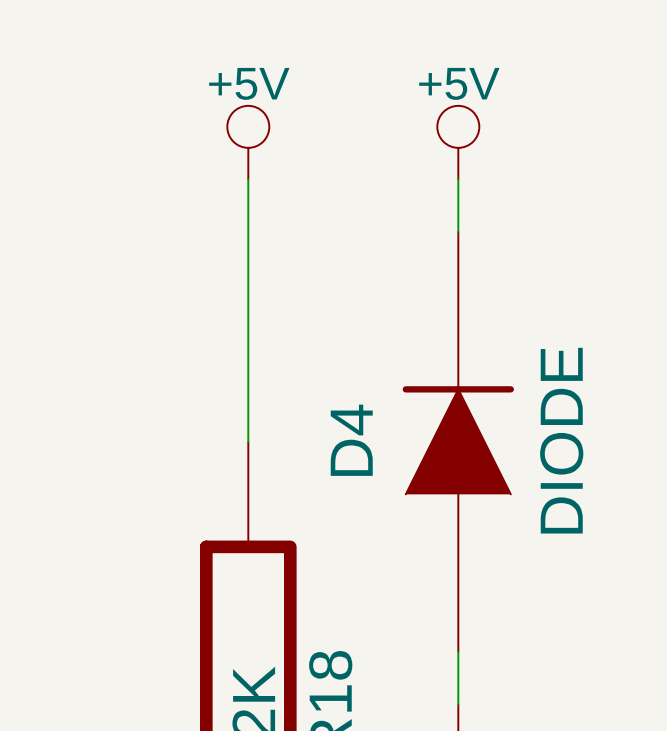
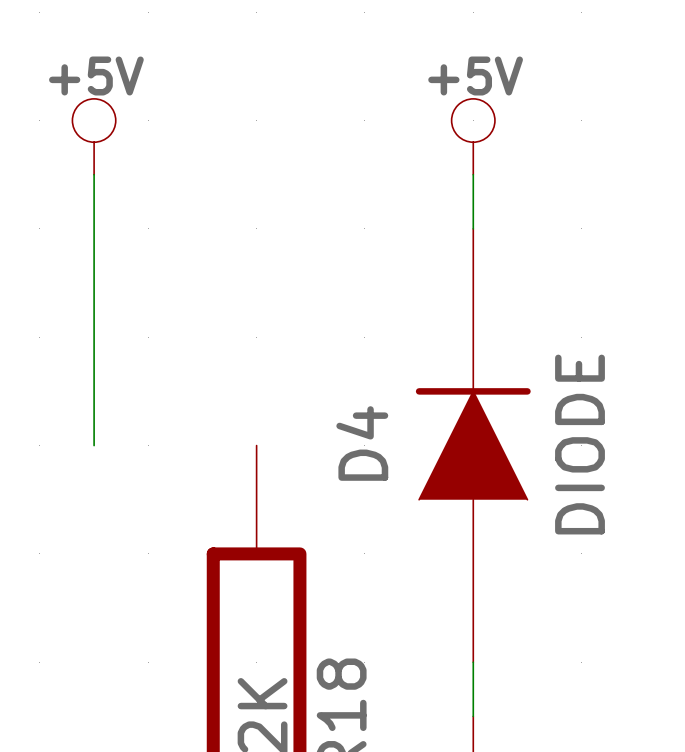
power symbol position: +5V (248, 142) -> +5V (94, 136)
wire: (248, 179) (248, 441) -> (94, 174) (94, 445)

